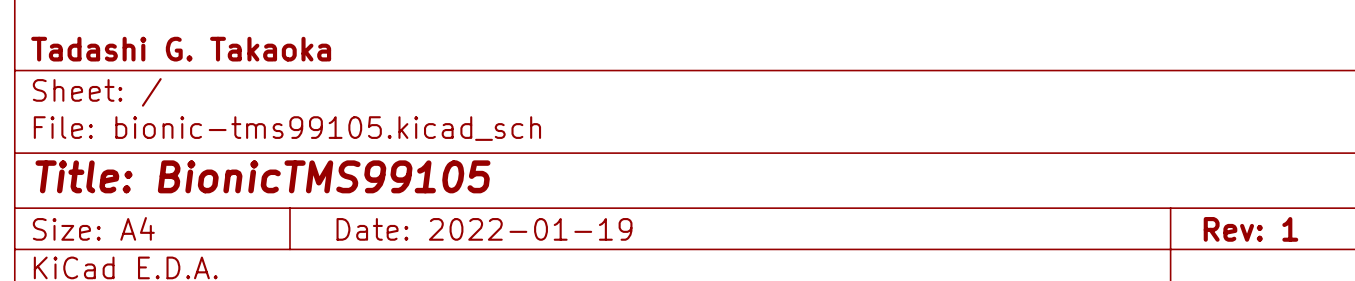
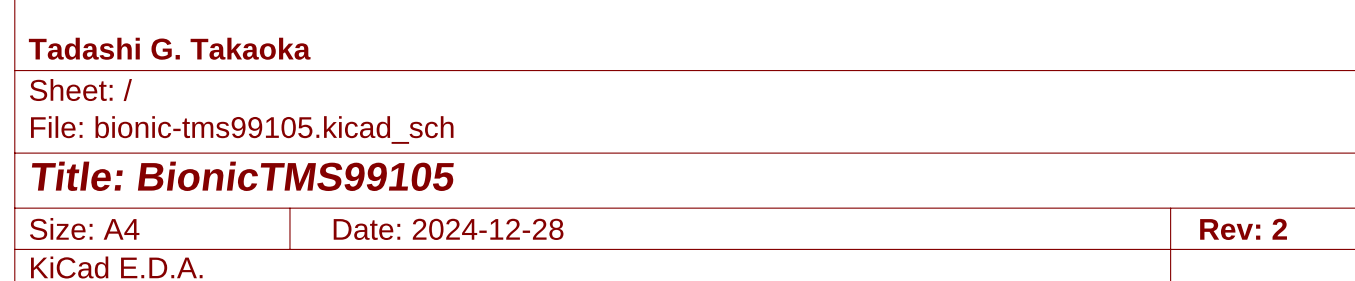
title block: Date: 2022-01-19 (484, 229) -> Date: 2024-12-28 (448, 229)
title block: Rev: 1 (1250, 229) -> Rev: 2 (1243, 229)

